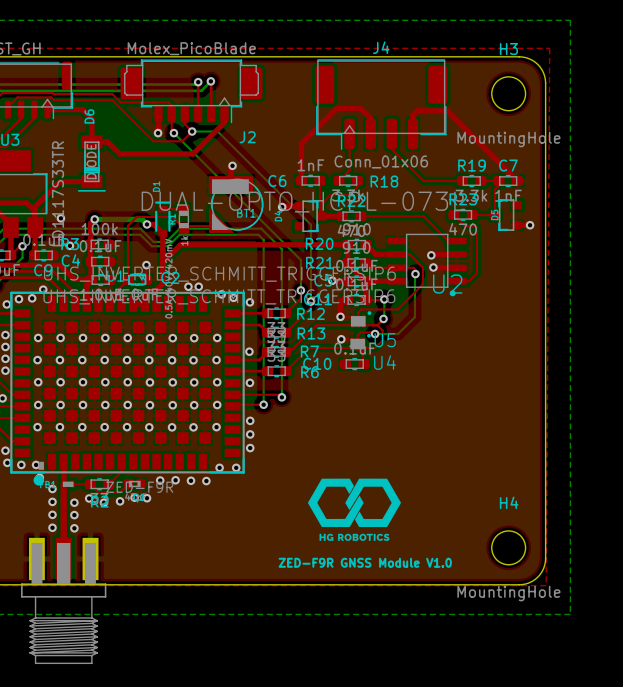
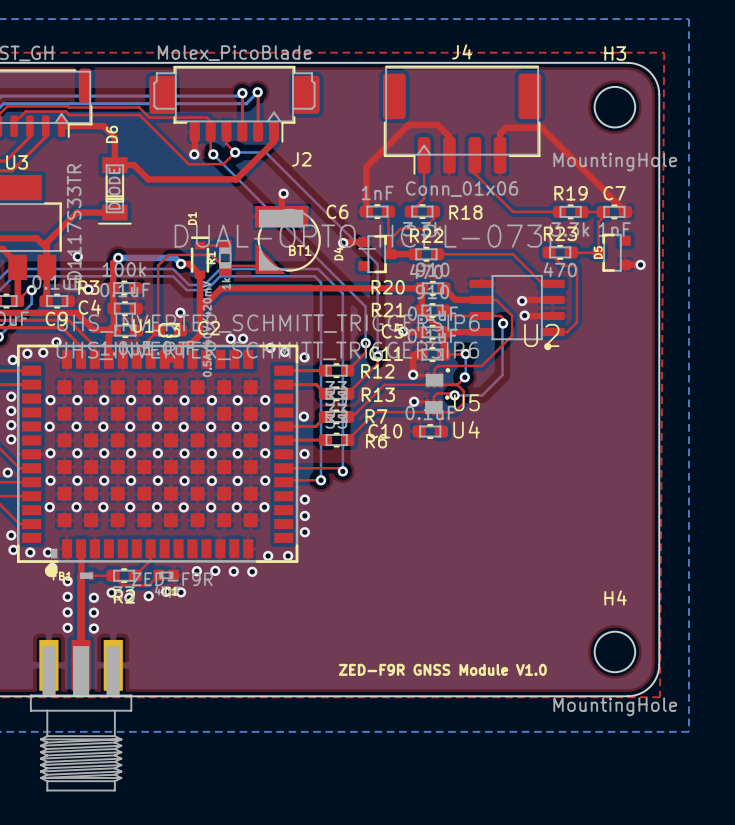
drawing: [307, 478, 402, 541] -> none

